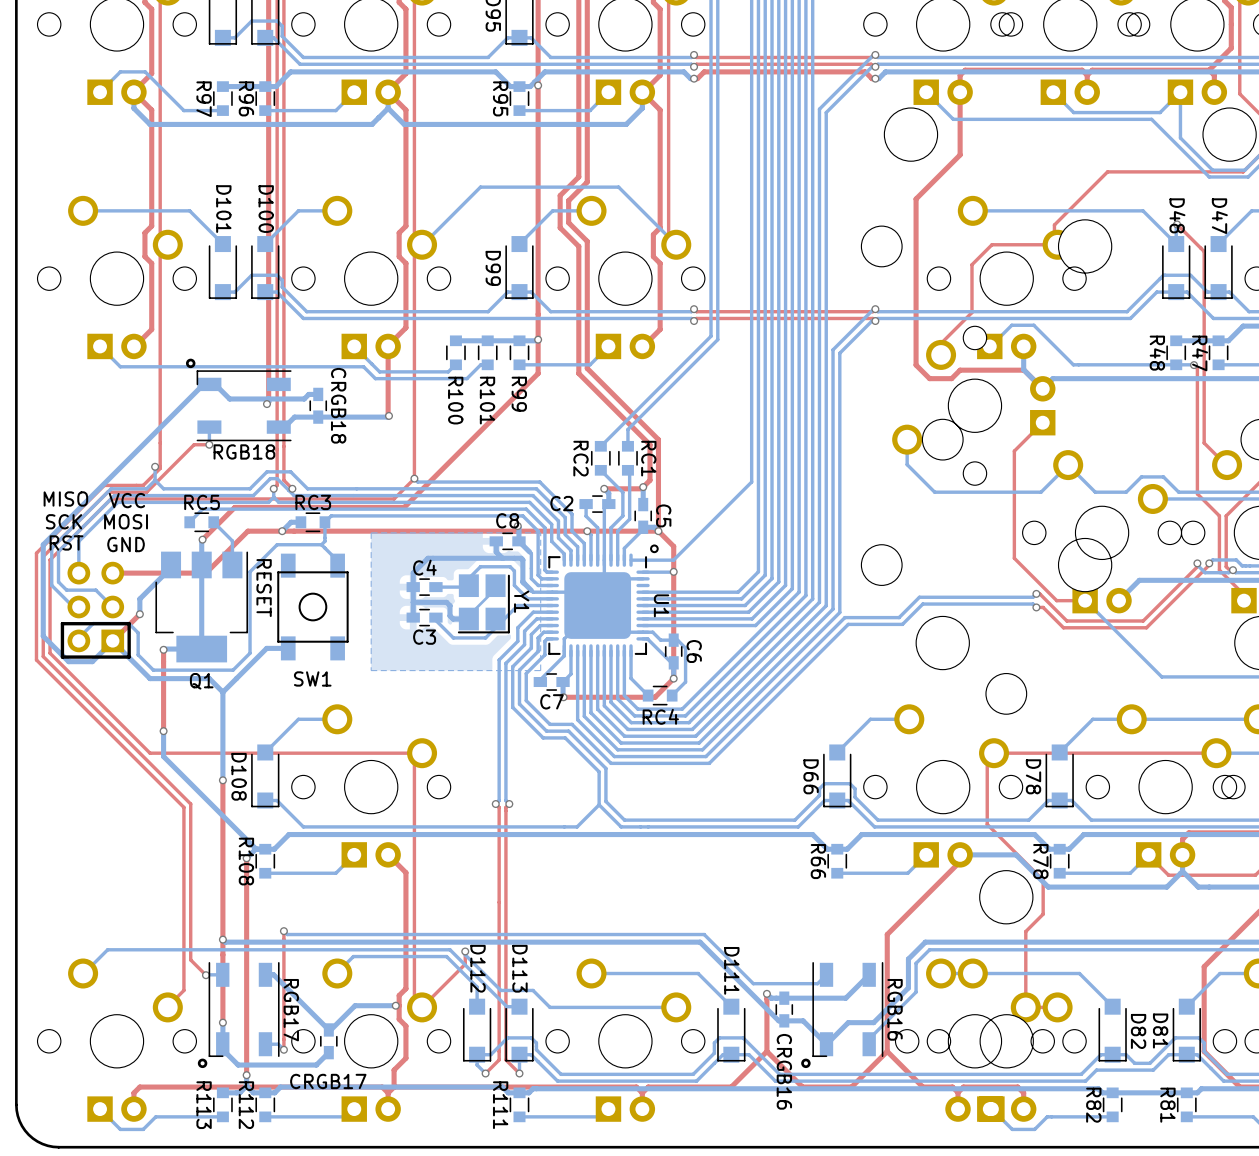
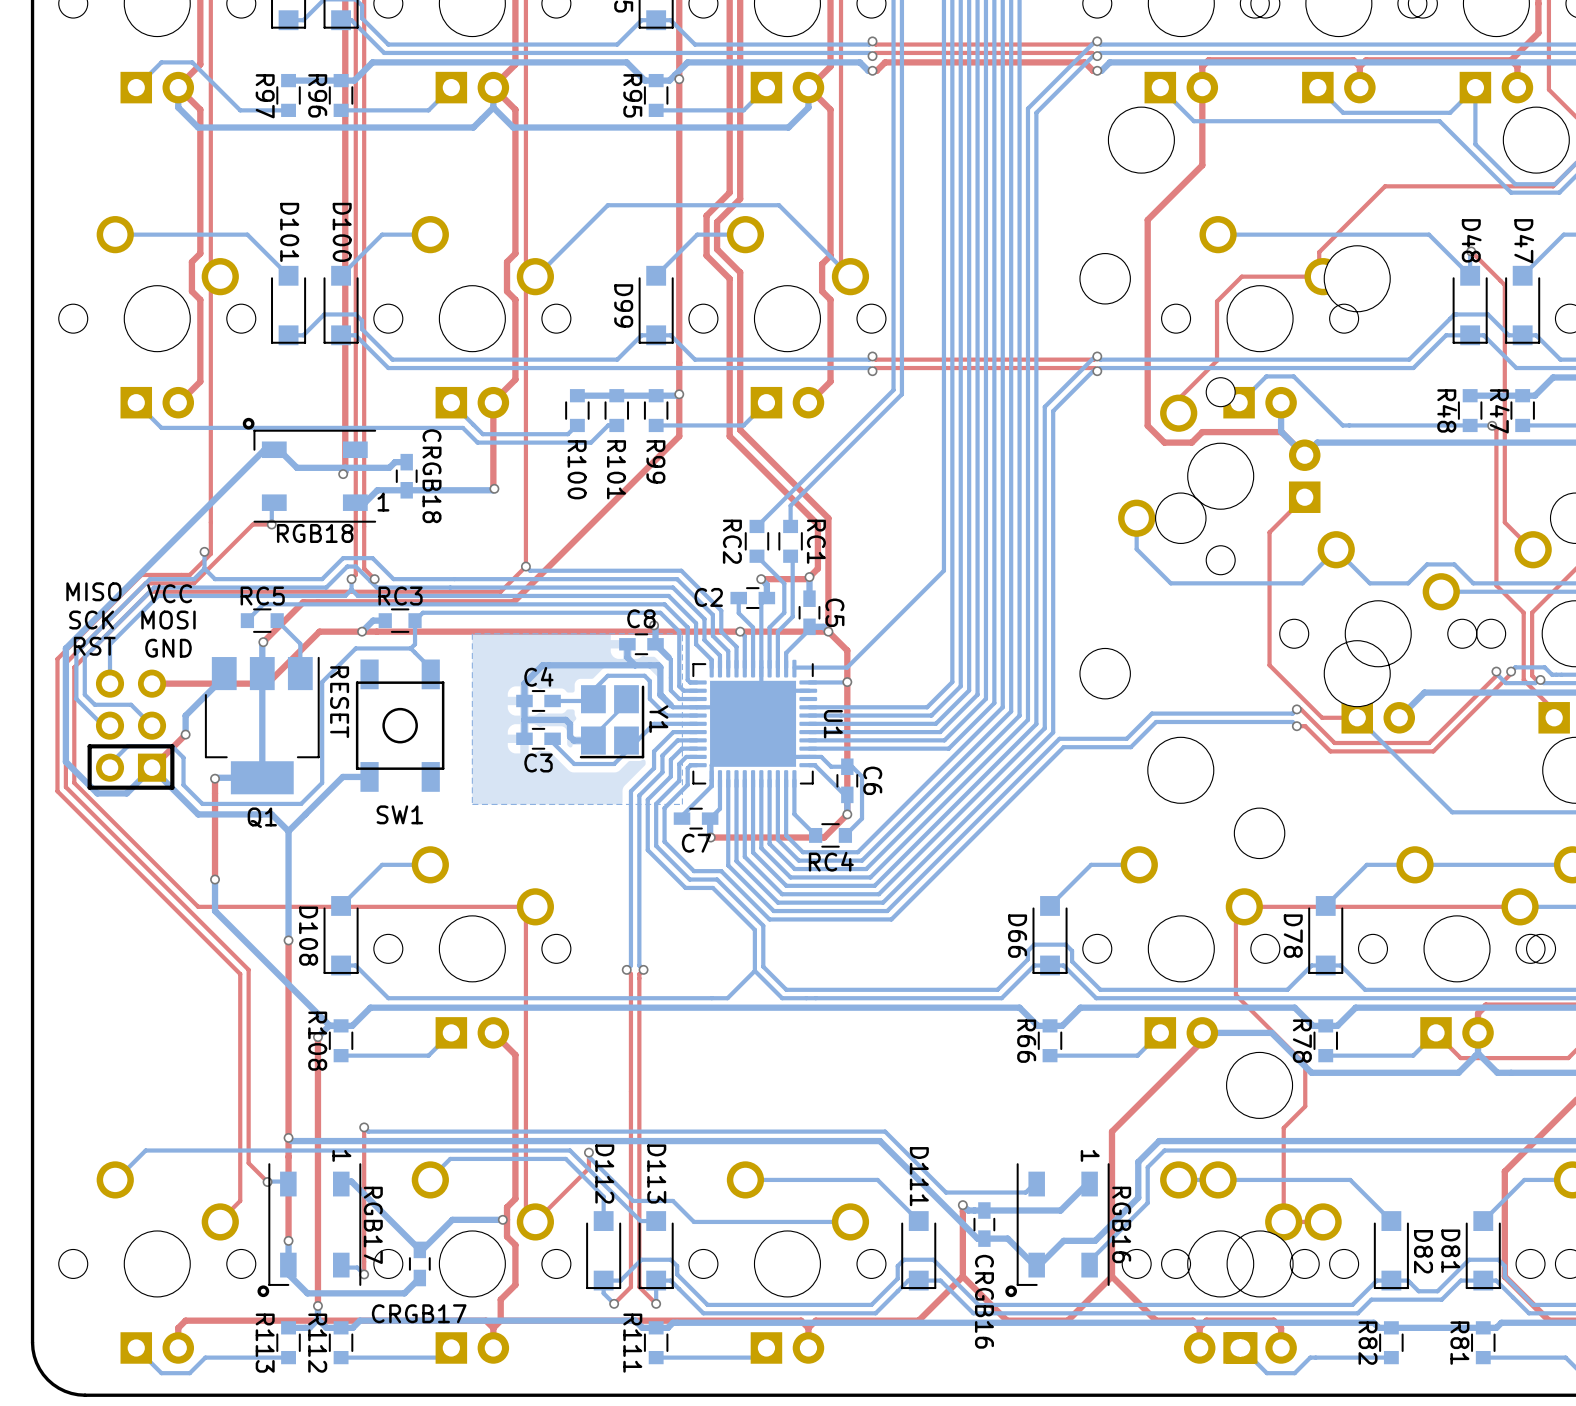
RGB18 footprint: [196, 370, 292, 442] -> [253, 429, 377, 523]
U1 footprint: [545, 544, 659, 658] -> [688, 659, 818, 788]
RGB17 footprint: [208, 962, 280, 1058] -> [268, 1163, 362, 1286]
RGB16 footprint: [812, 962, 884, 1058] -> [1016, 1163, 1110, 1286]

